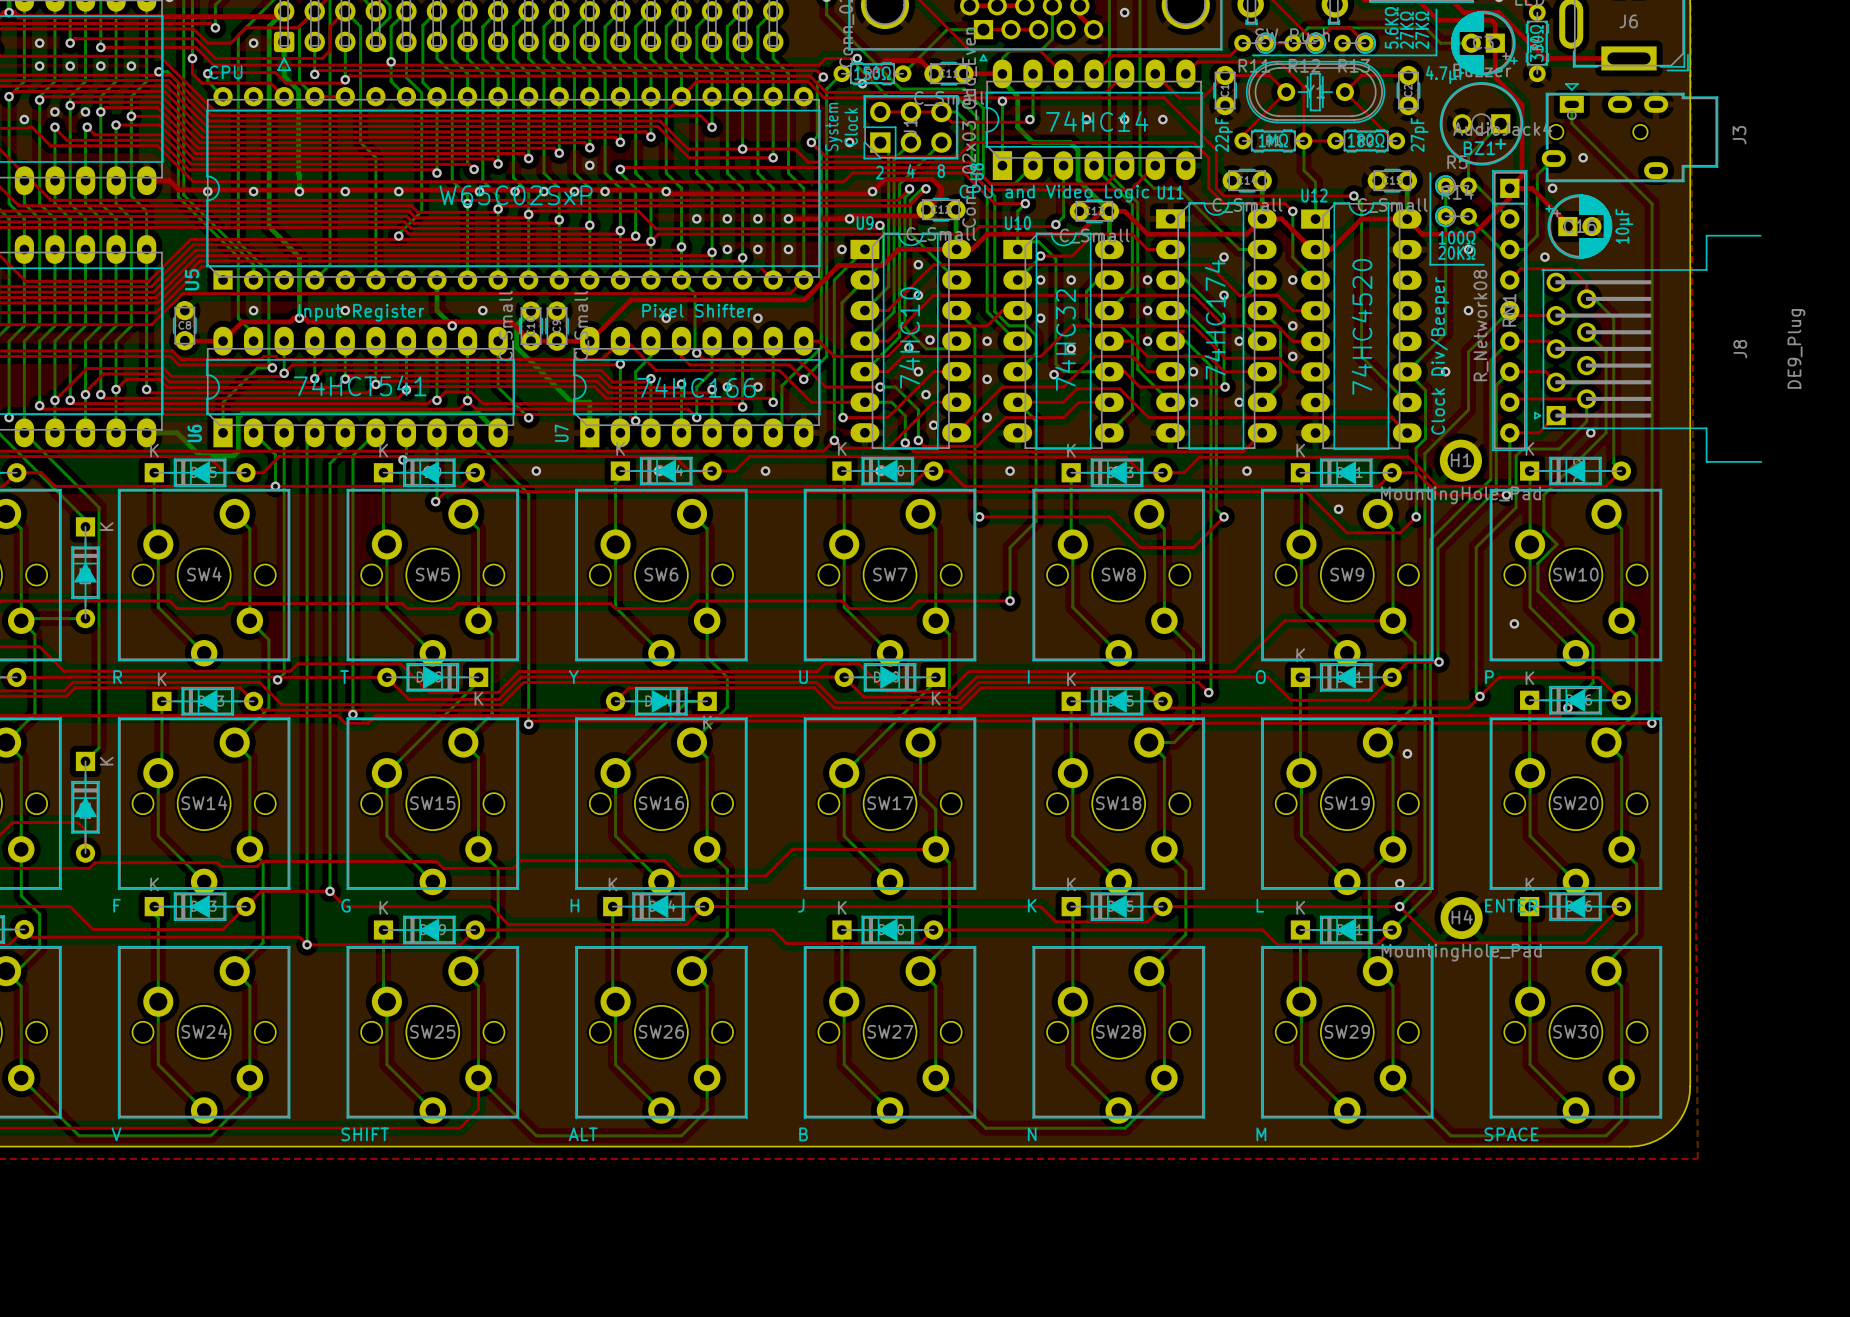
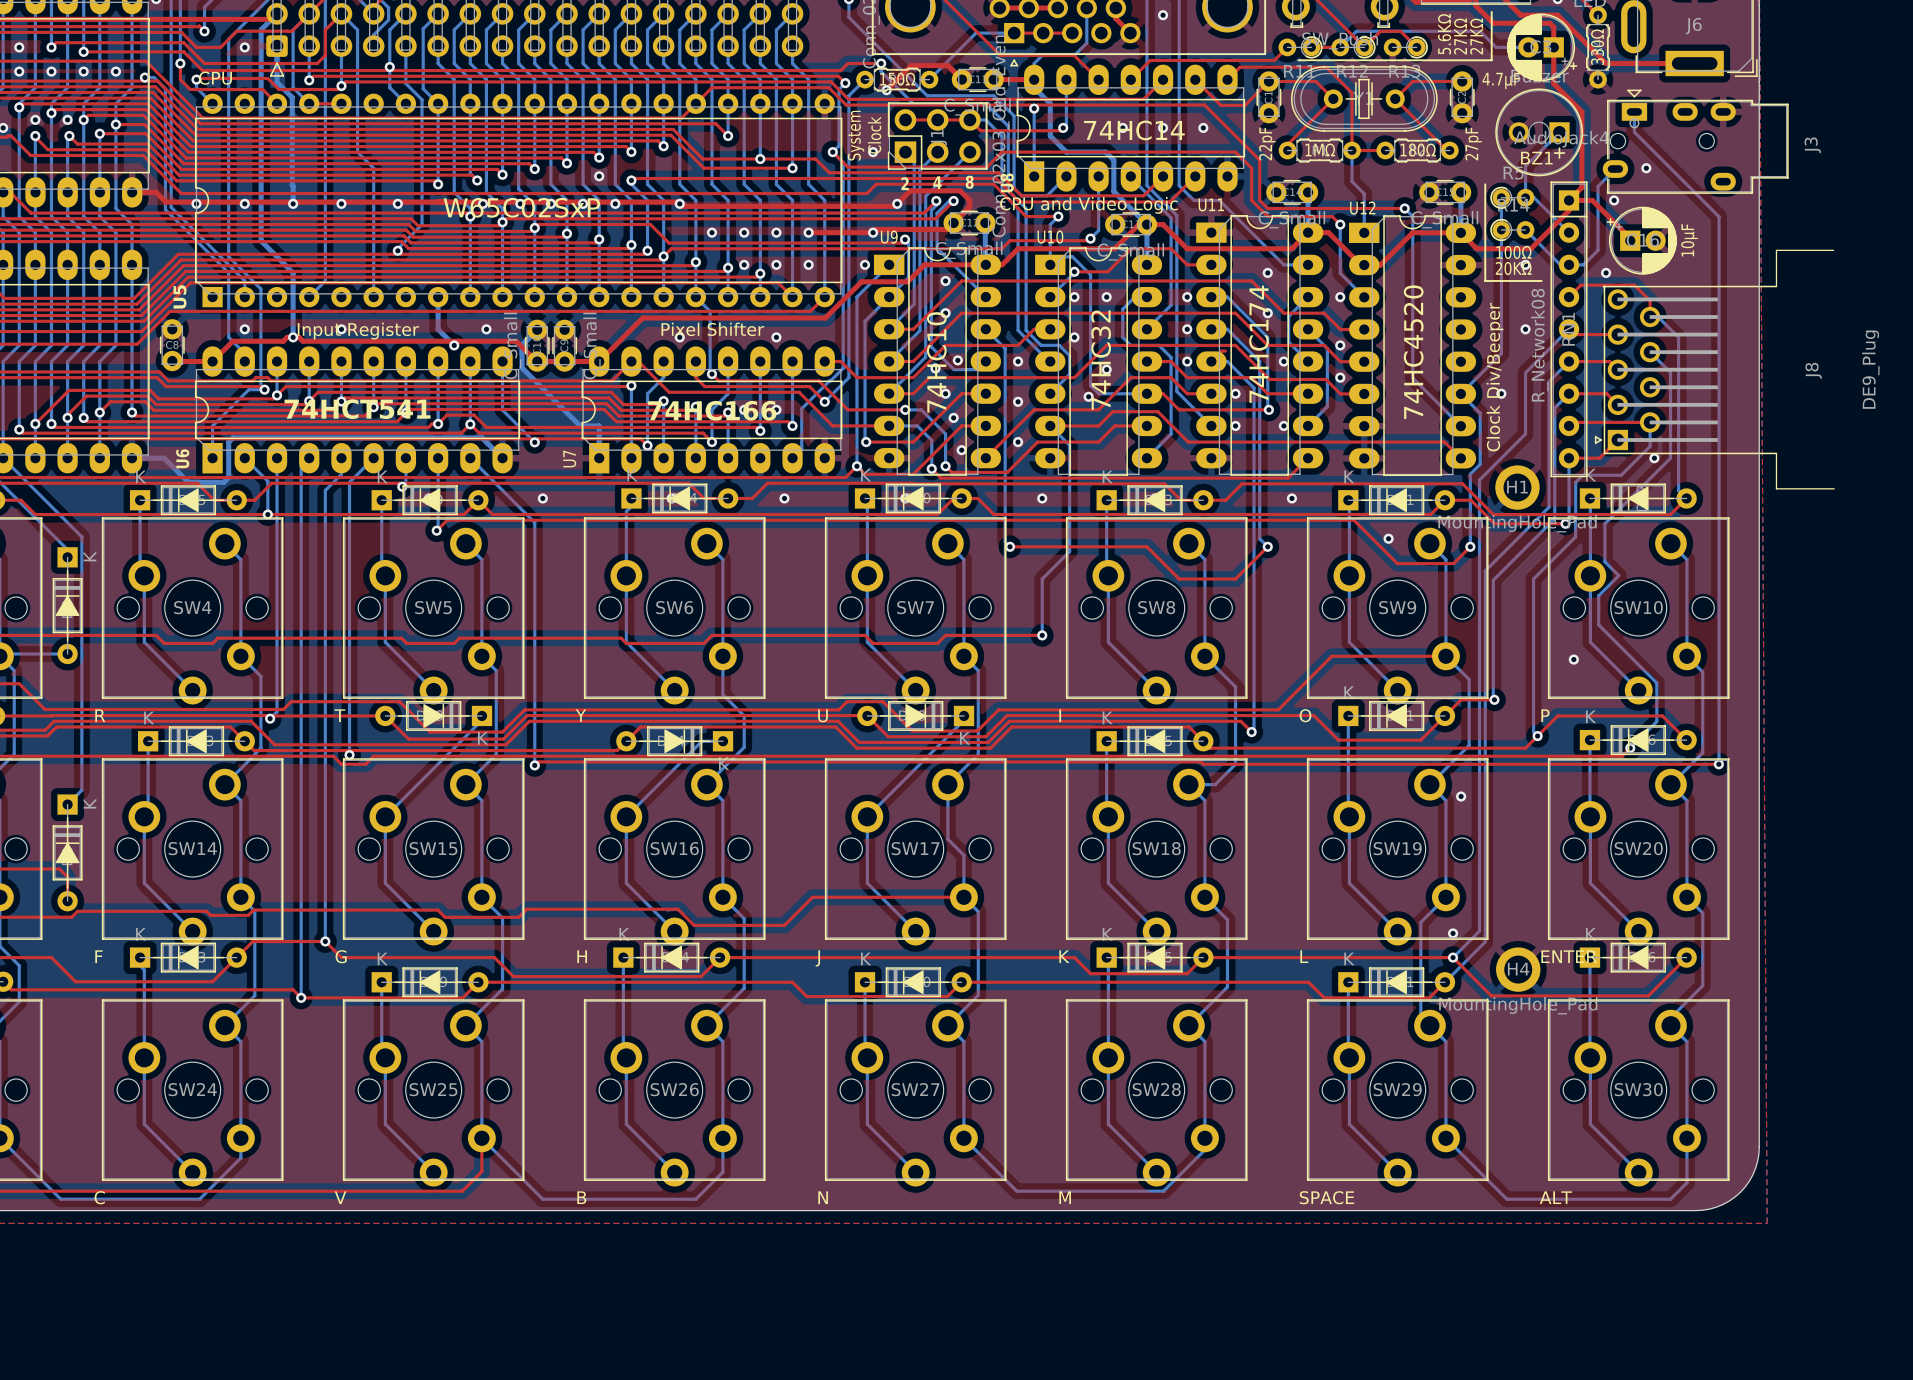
SW24 value: V (116, 1134) -> C (99, 1197)
SW25 value: SHIFT (365, 1134) -> V (340, 1197)
SW26 value: ALT (583, 1134) -> B (581, 1197)
SW27 value: B (803, 1134) -> N (823, 1197)
SW28 value: N (1032, 1134) -> M (1065, 1197)
SW29 value: M (1261, 1134) -> SPACE (1326, 1197)
SW30 value: SPACE (1511, 1134) -> ALT (1555, 1197)

